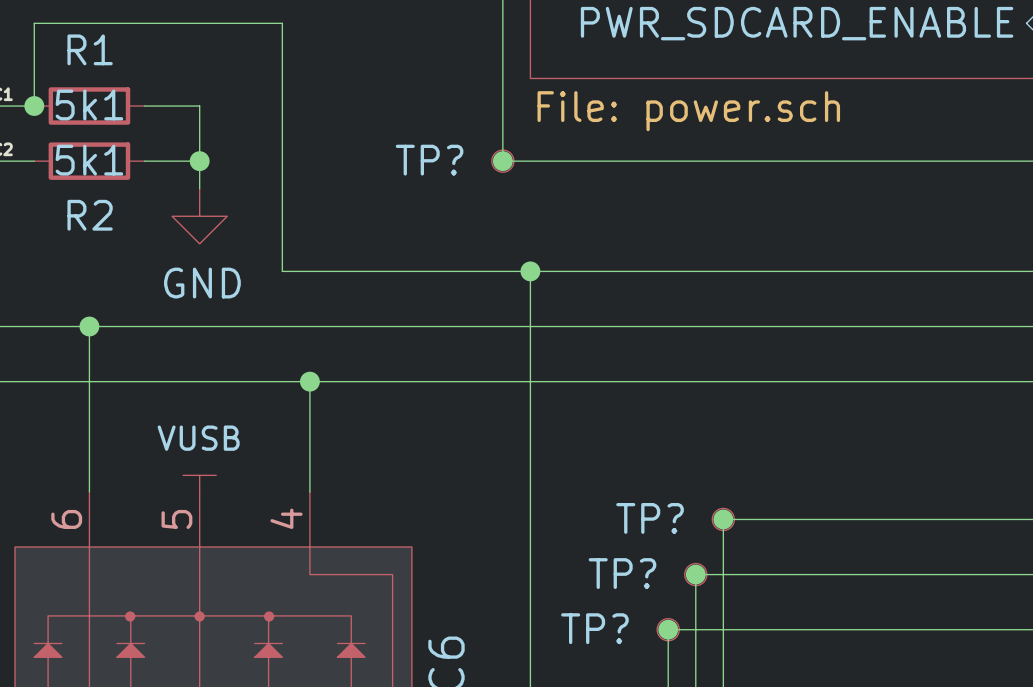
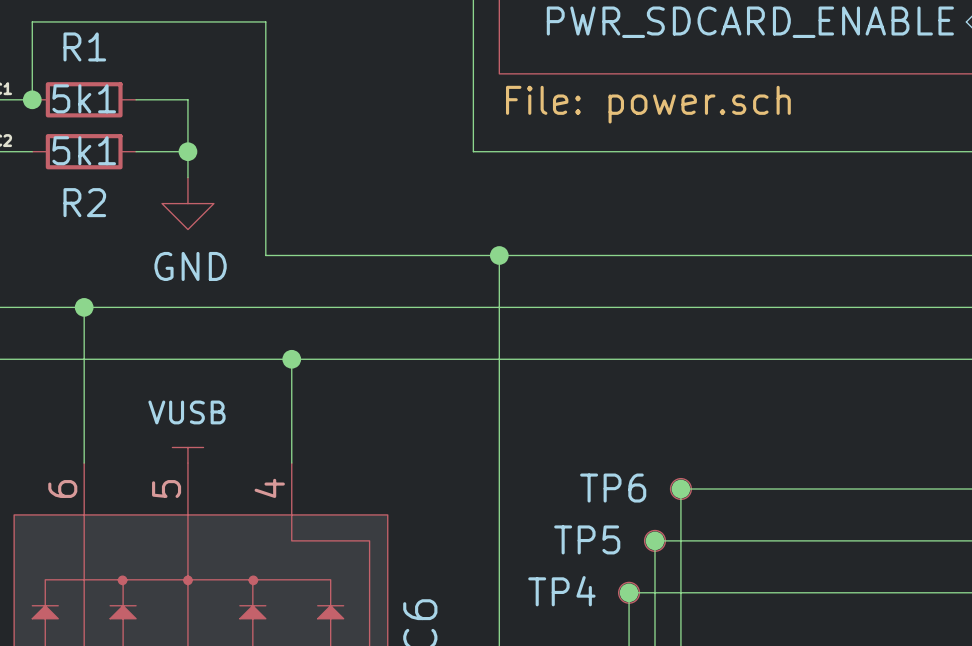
TP?: (502, 161) -> none
junction: (502, 161) -> none
TP? name: TP? (650, 518) -> TP6 (613, 488)
TP? name: TP? (622, 573) -> TP5 (587, 539)
TP? name: TP? (594, 628) -> TP4 (561, 591)

